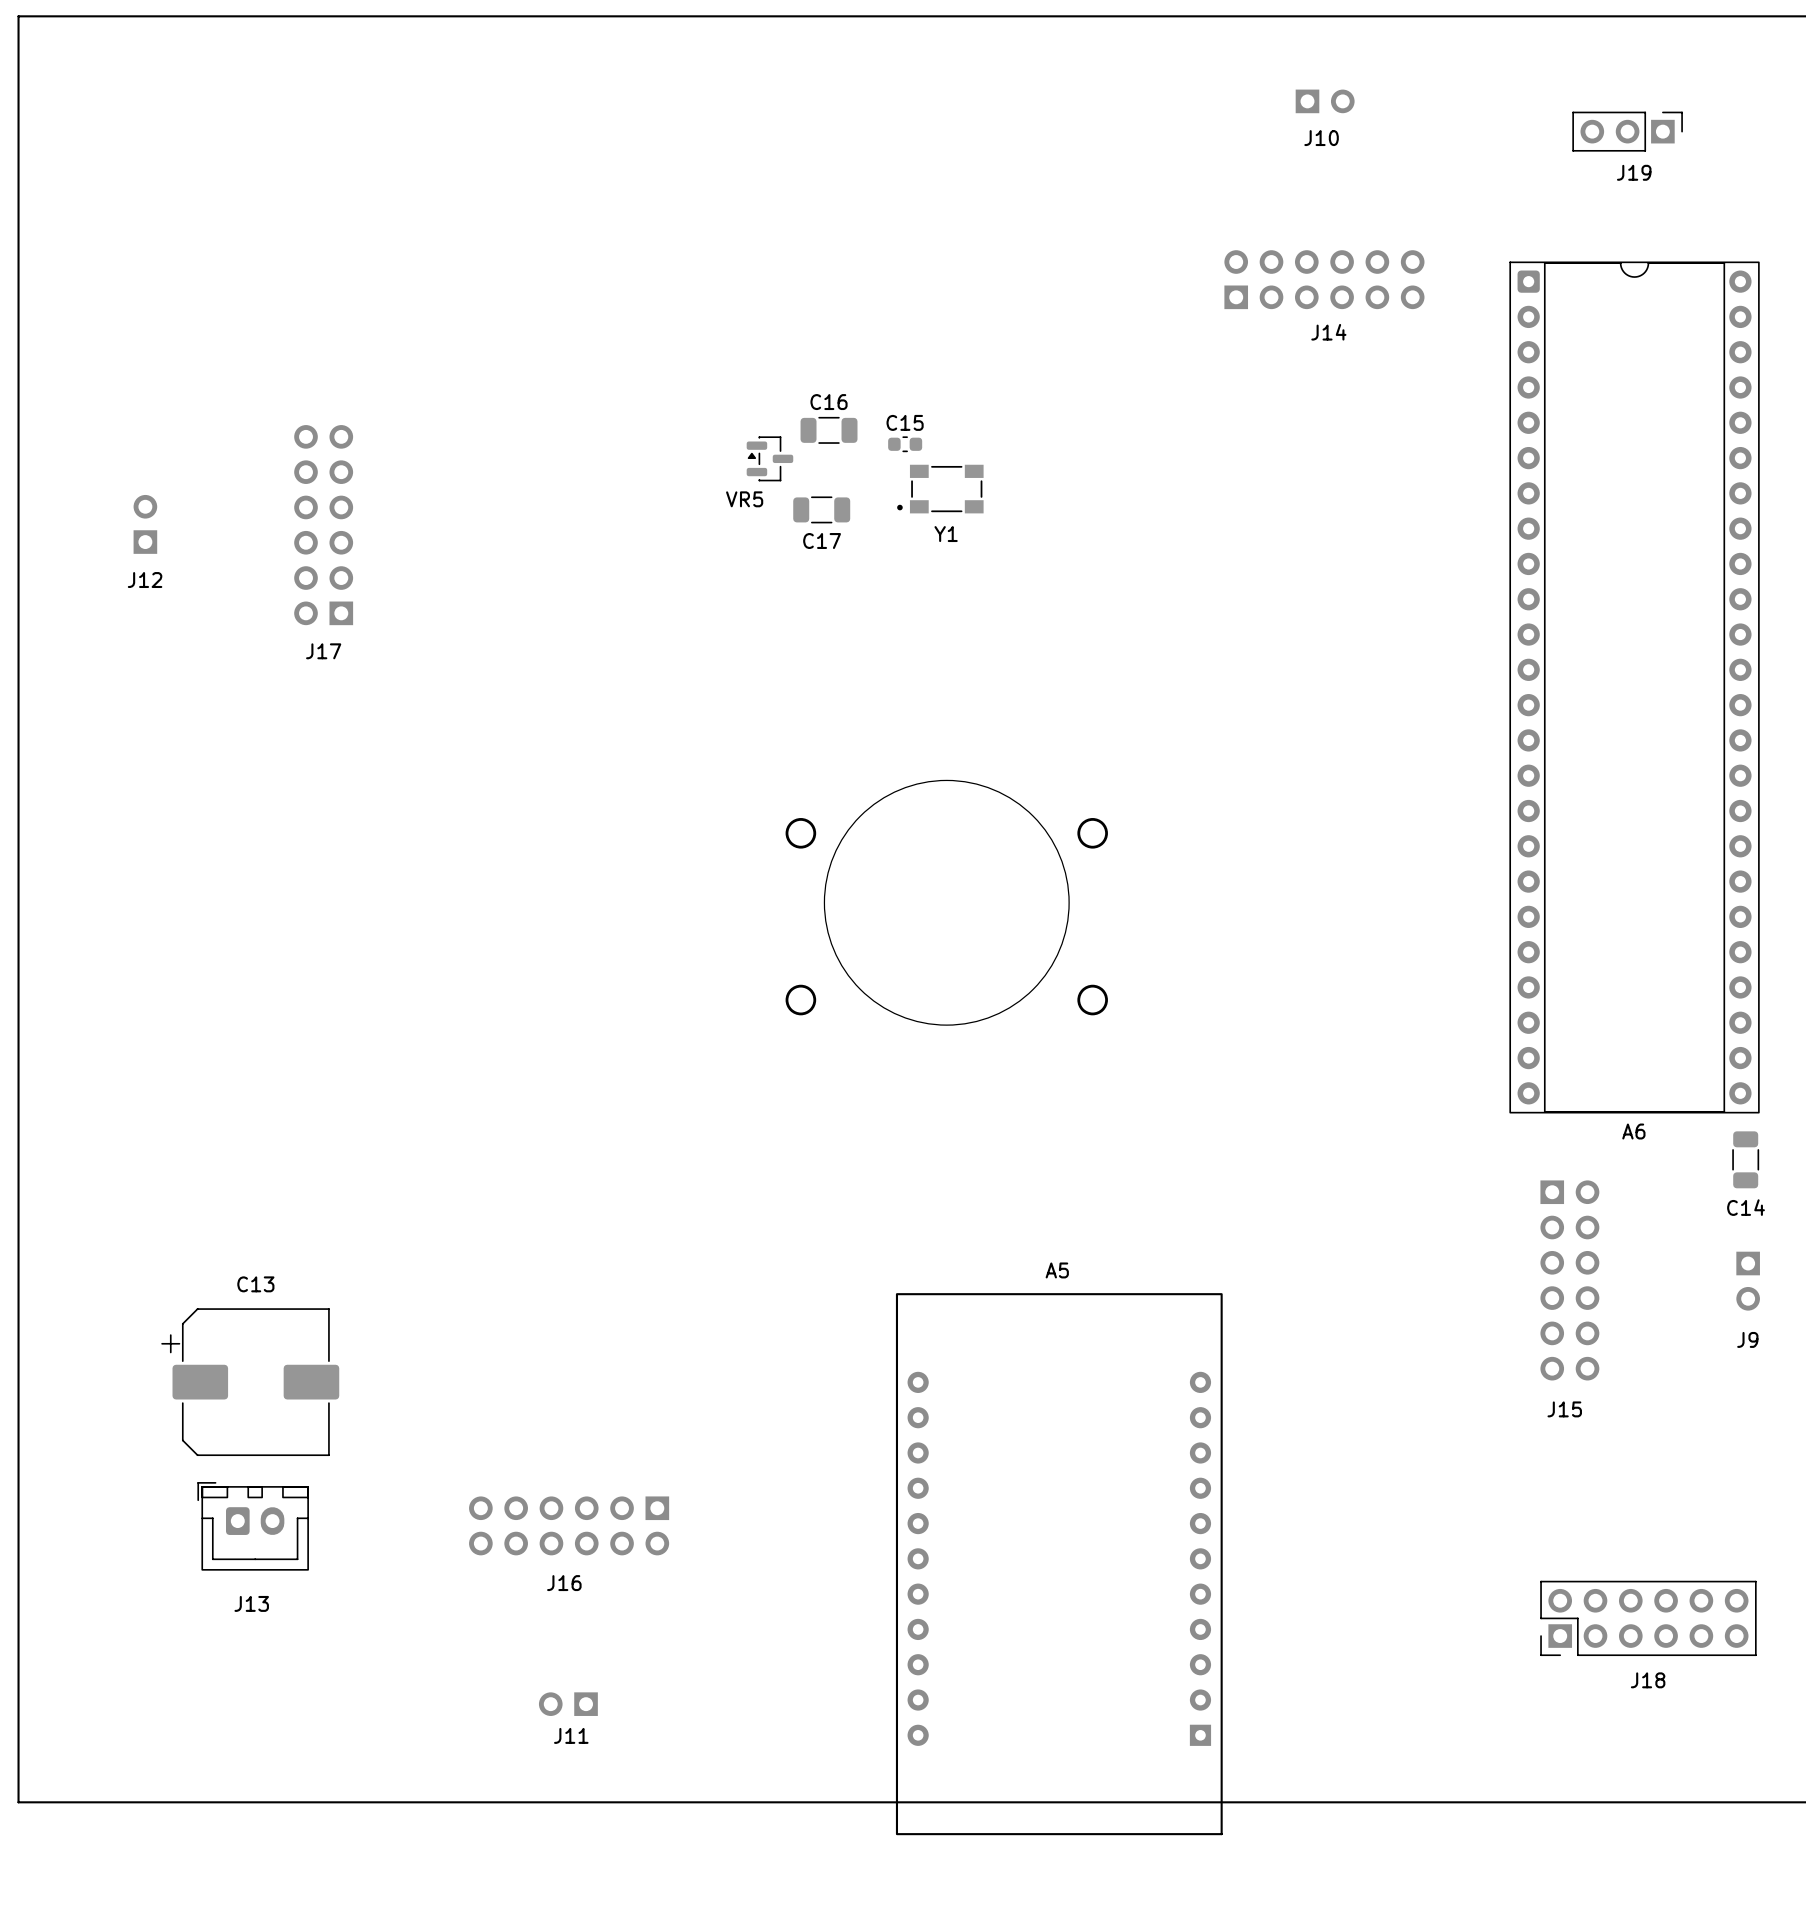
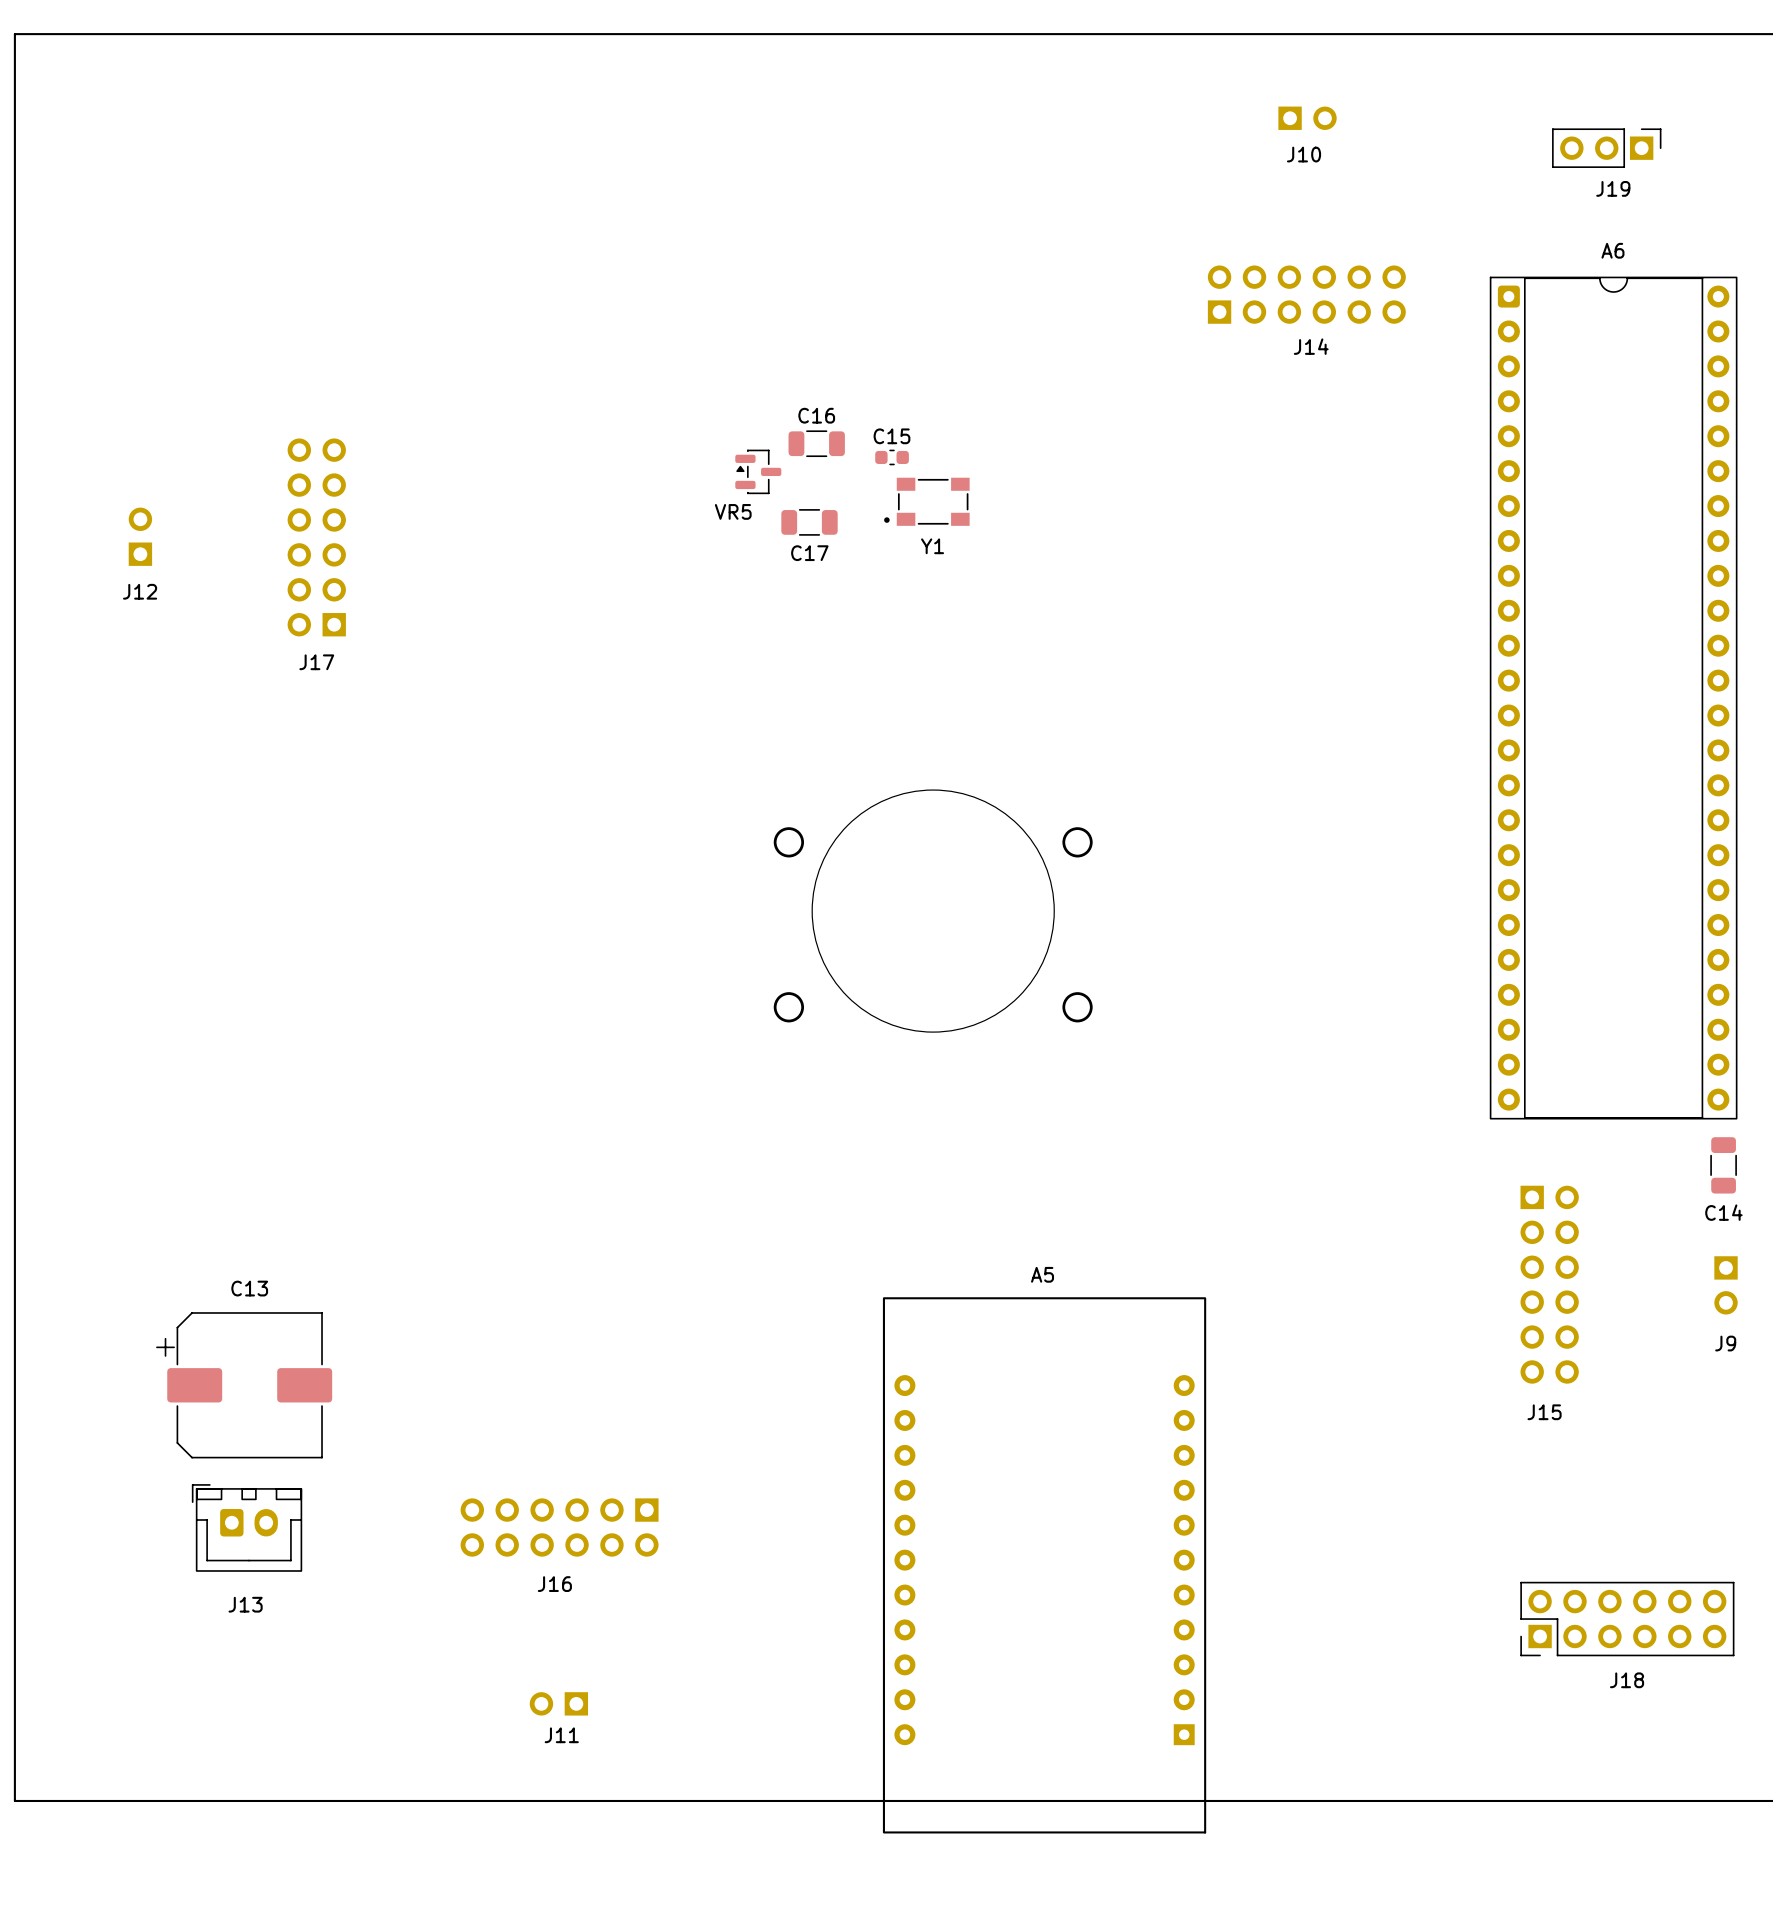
A6 name position: A6 (1633, 1131) -> A6 (1612, 250)

